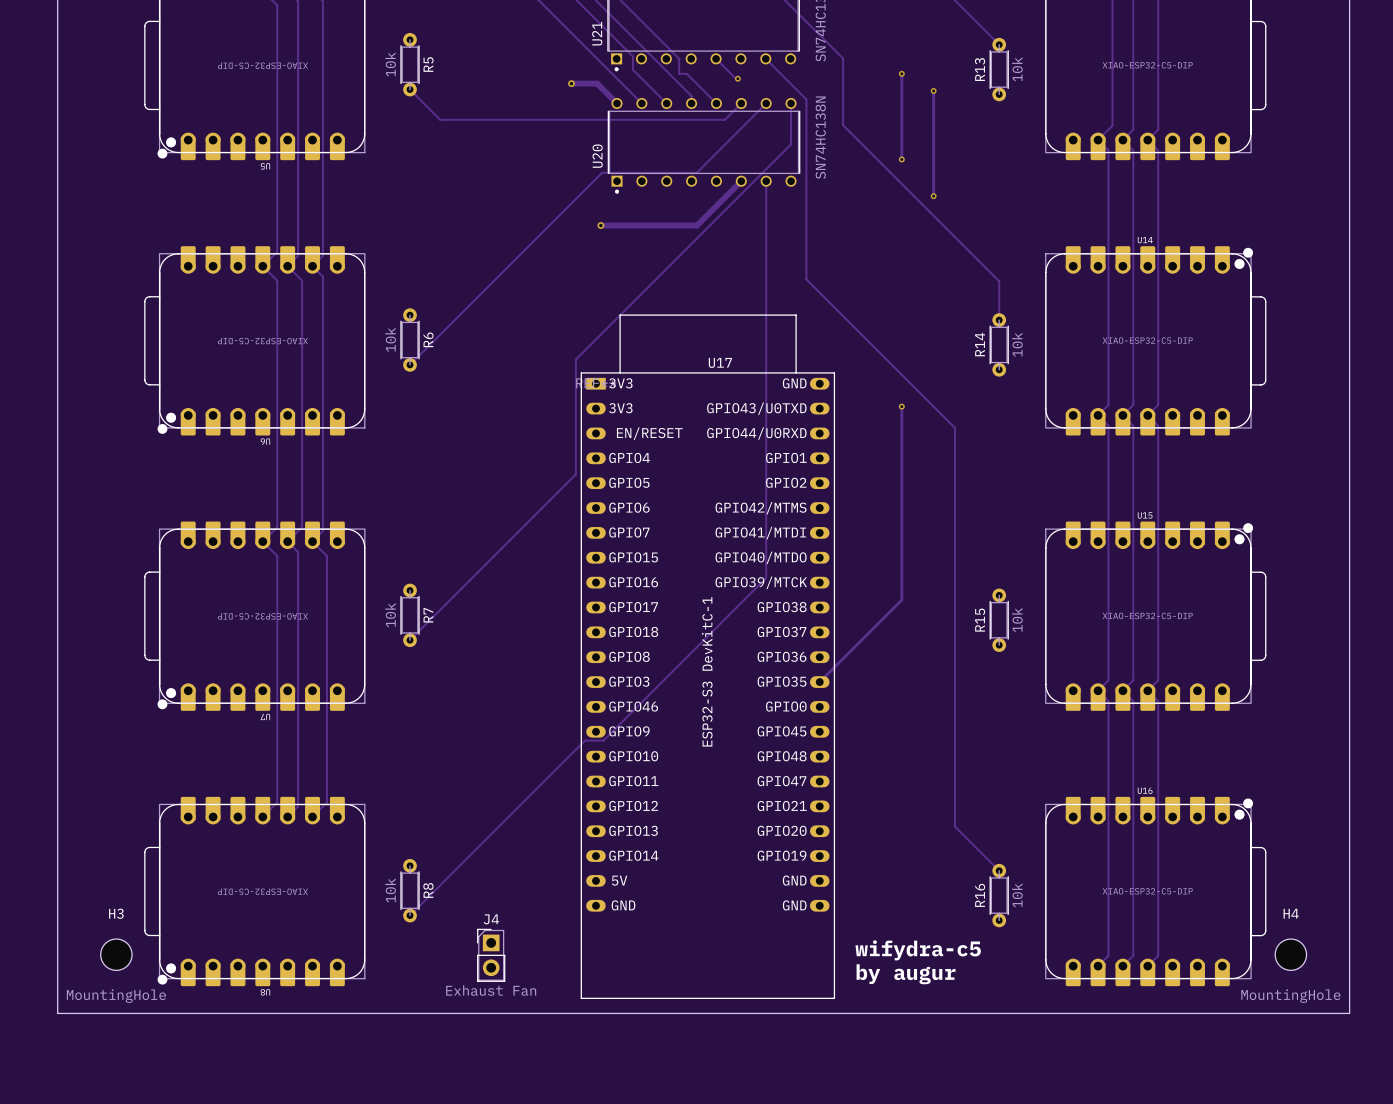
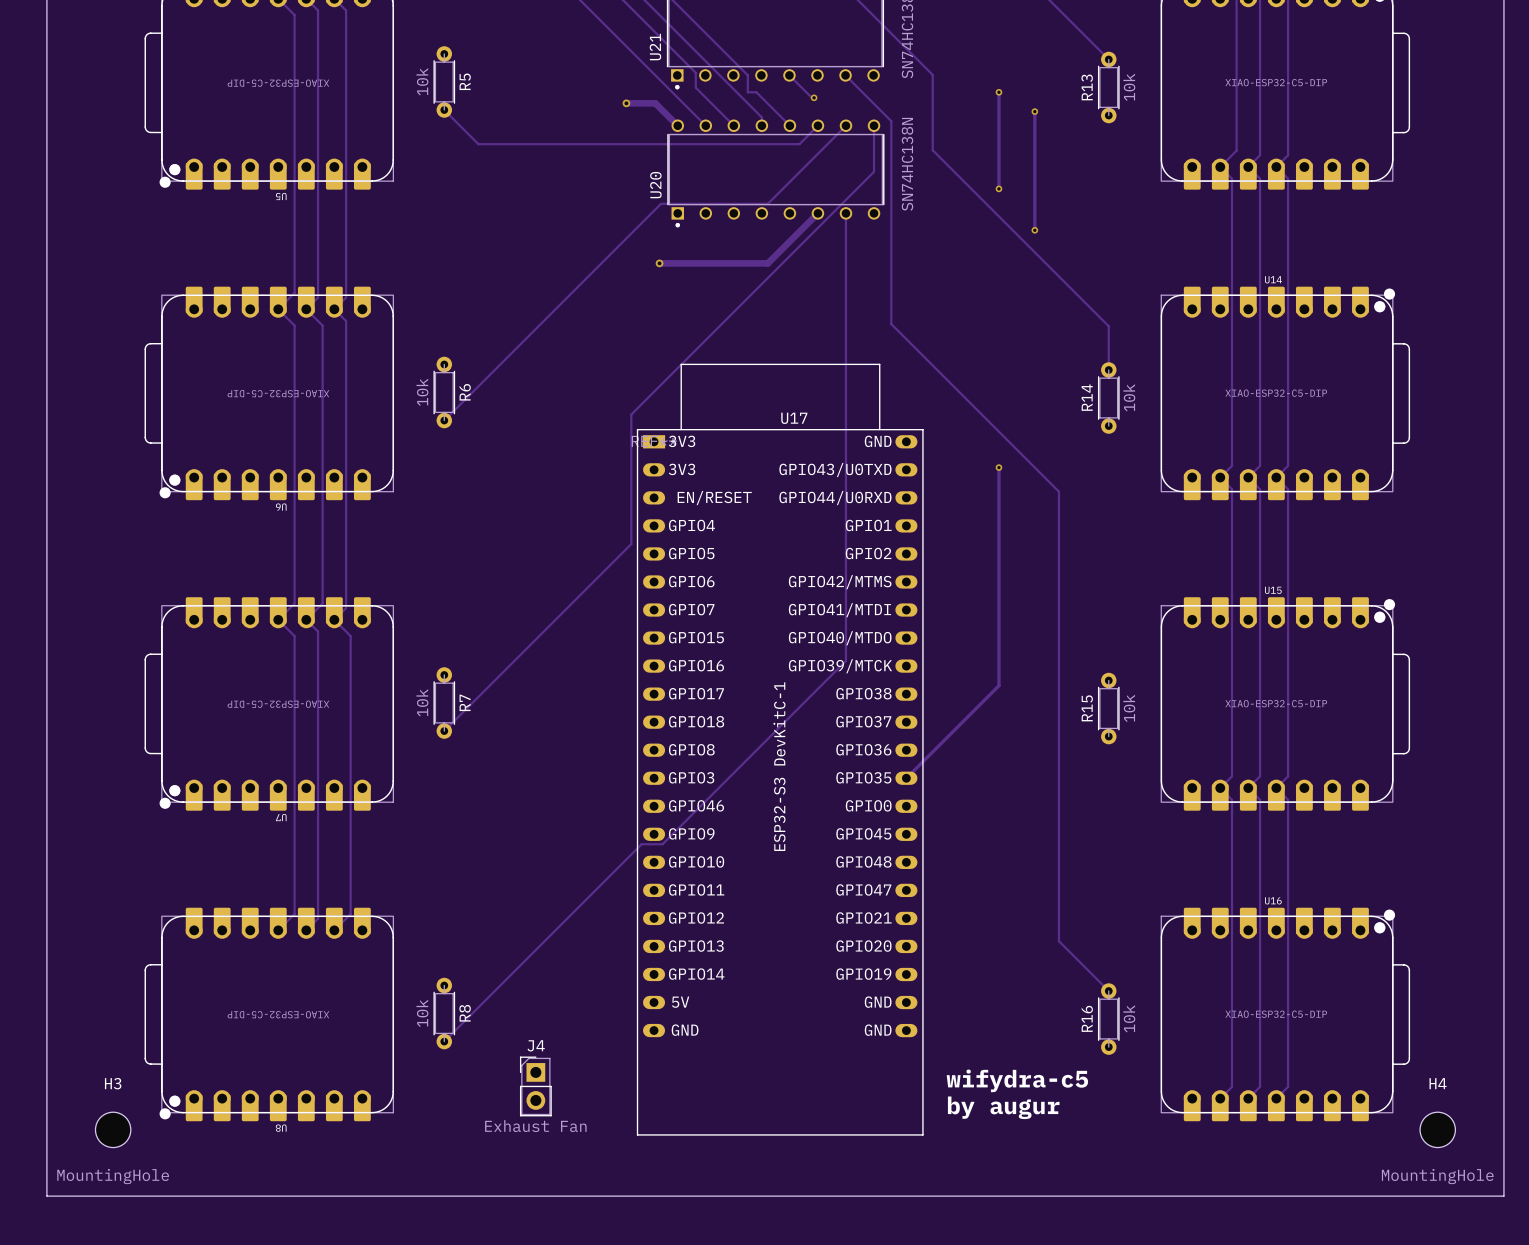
H3 position: (116, 954) -> (113, 1129)
H4 position: (1290, 954) -> (1437, 1129)
board edge: (57, 1013) (1349, 1013) -> (46, 1151) (46, 1196) (1503, 1196) (1503, 1151)

